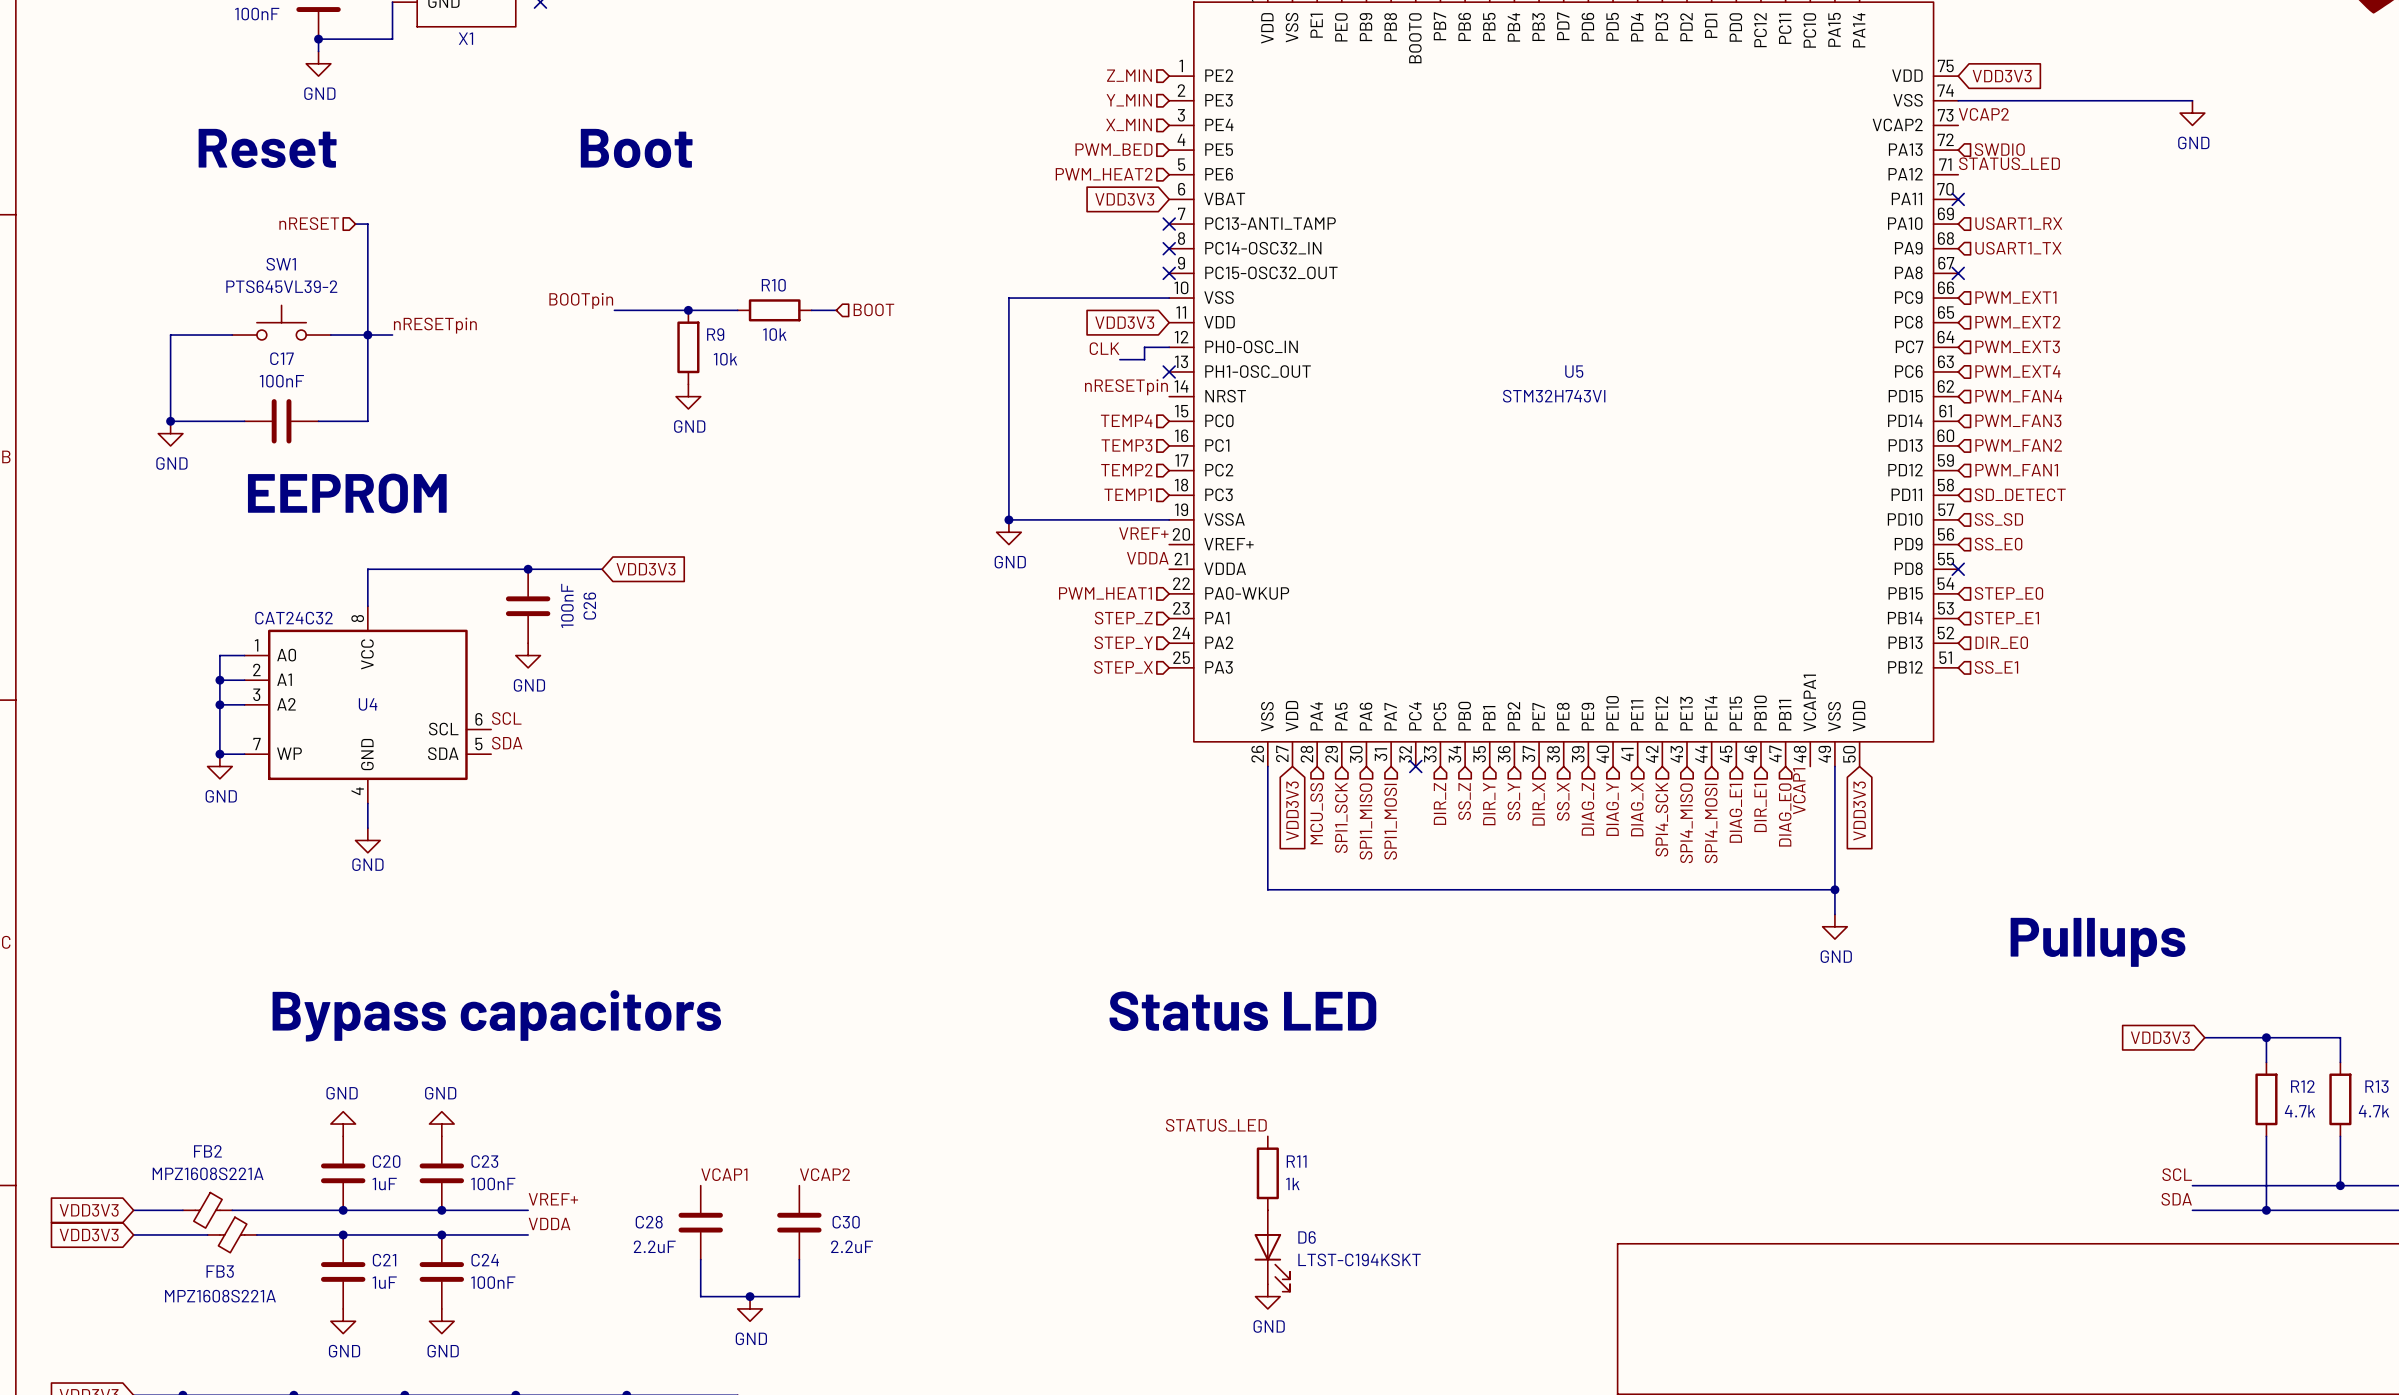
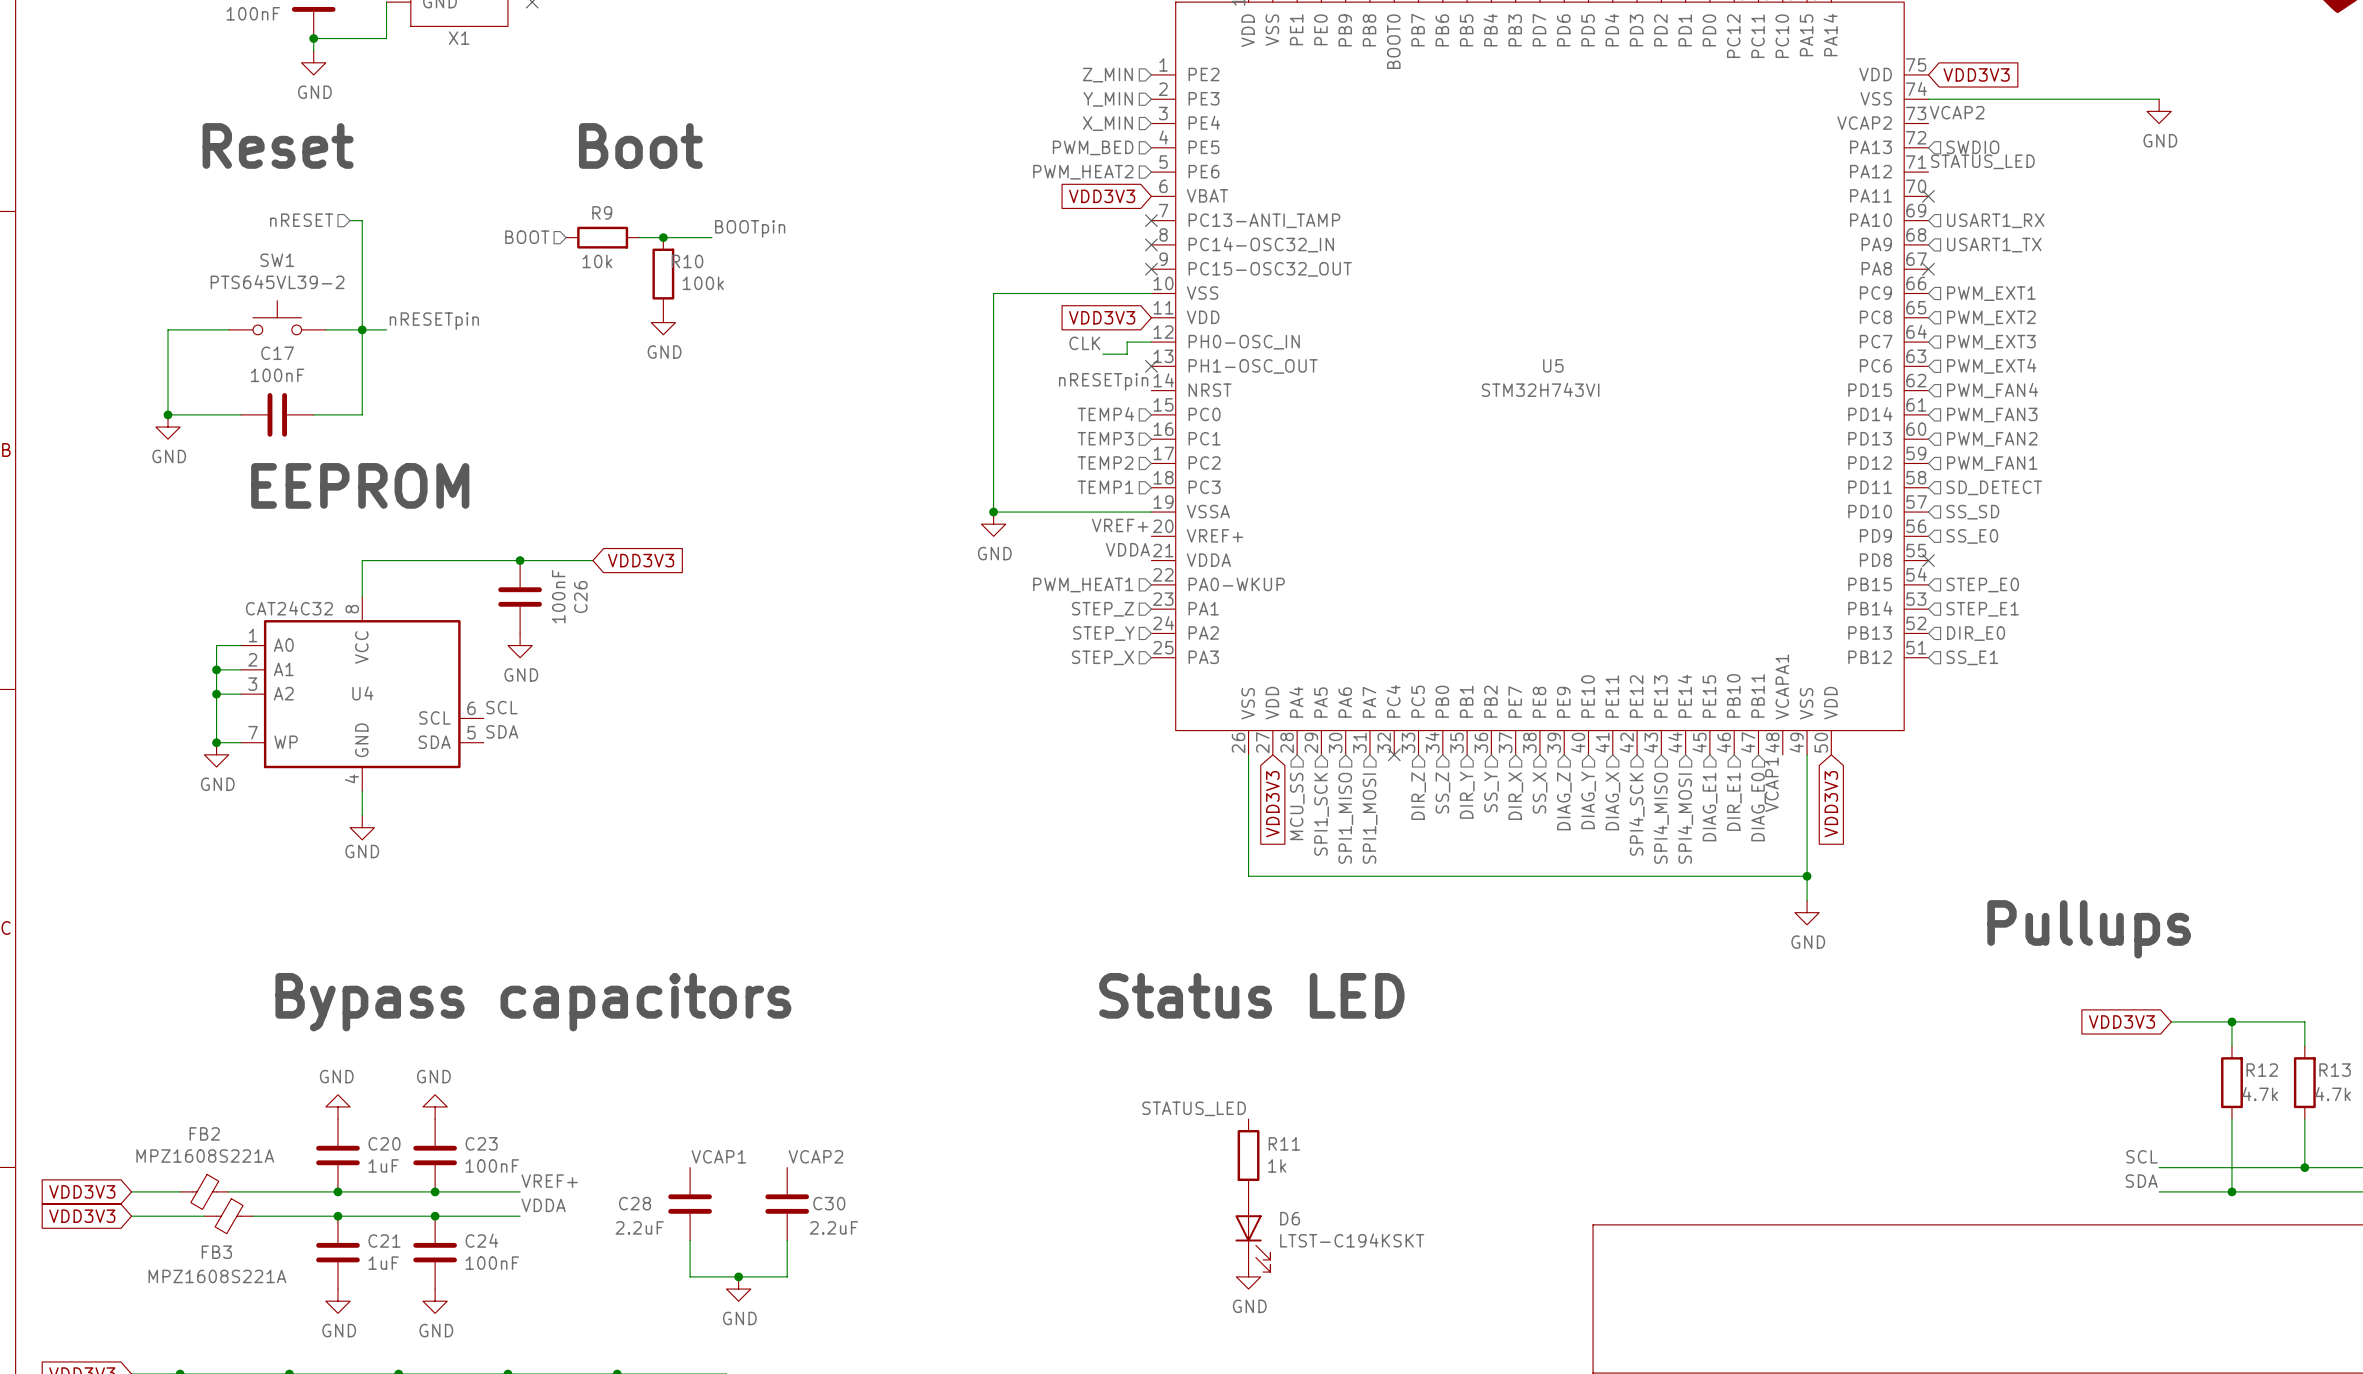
hierarchical label: none -> BOOT (527, 237)
wire: none -> (639, 237) (711, 237)
junction: none -> (663, 237)
label position: BOOTpin (581, 300) -> BOOTpin (750, 228)
hierarchical label: BOOT (873, 309) -> none
wire: (614, 310) (737, 310) -> none
junction: (688, 310) -> none
R10 rotation: 0° (774, 310) -> 90° clockwise (663, 274)
R10 position: (774, 310) -> (663, 274)
wire: (811, 310) (836, 310) -> none
R9 name position: R9 (715, 334) -> R9 (602, 212)
R10 value: 10k (774, 334) -> 100k (703, 283)
R9 rotation: 0° (688, 347) -> 90° clockwise (602, 237)
R9 position: (688, 347) -> (602, 237)
power symbol position: GND (688, 396) -> GND (663, 322)

